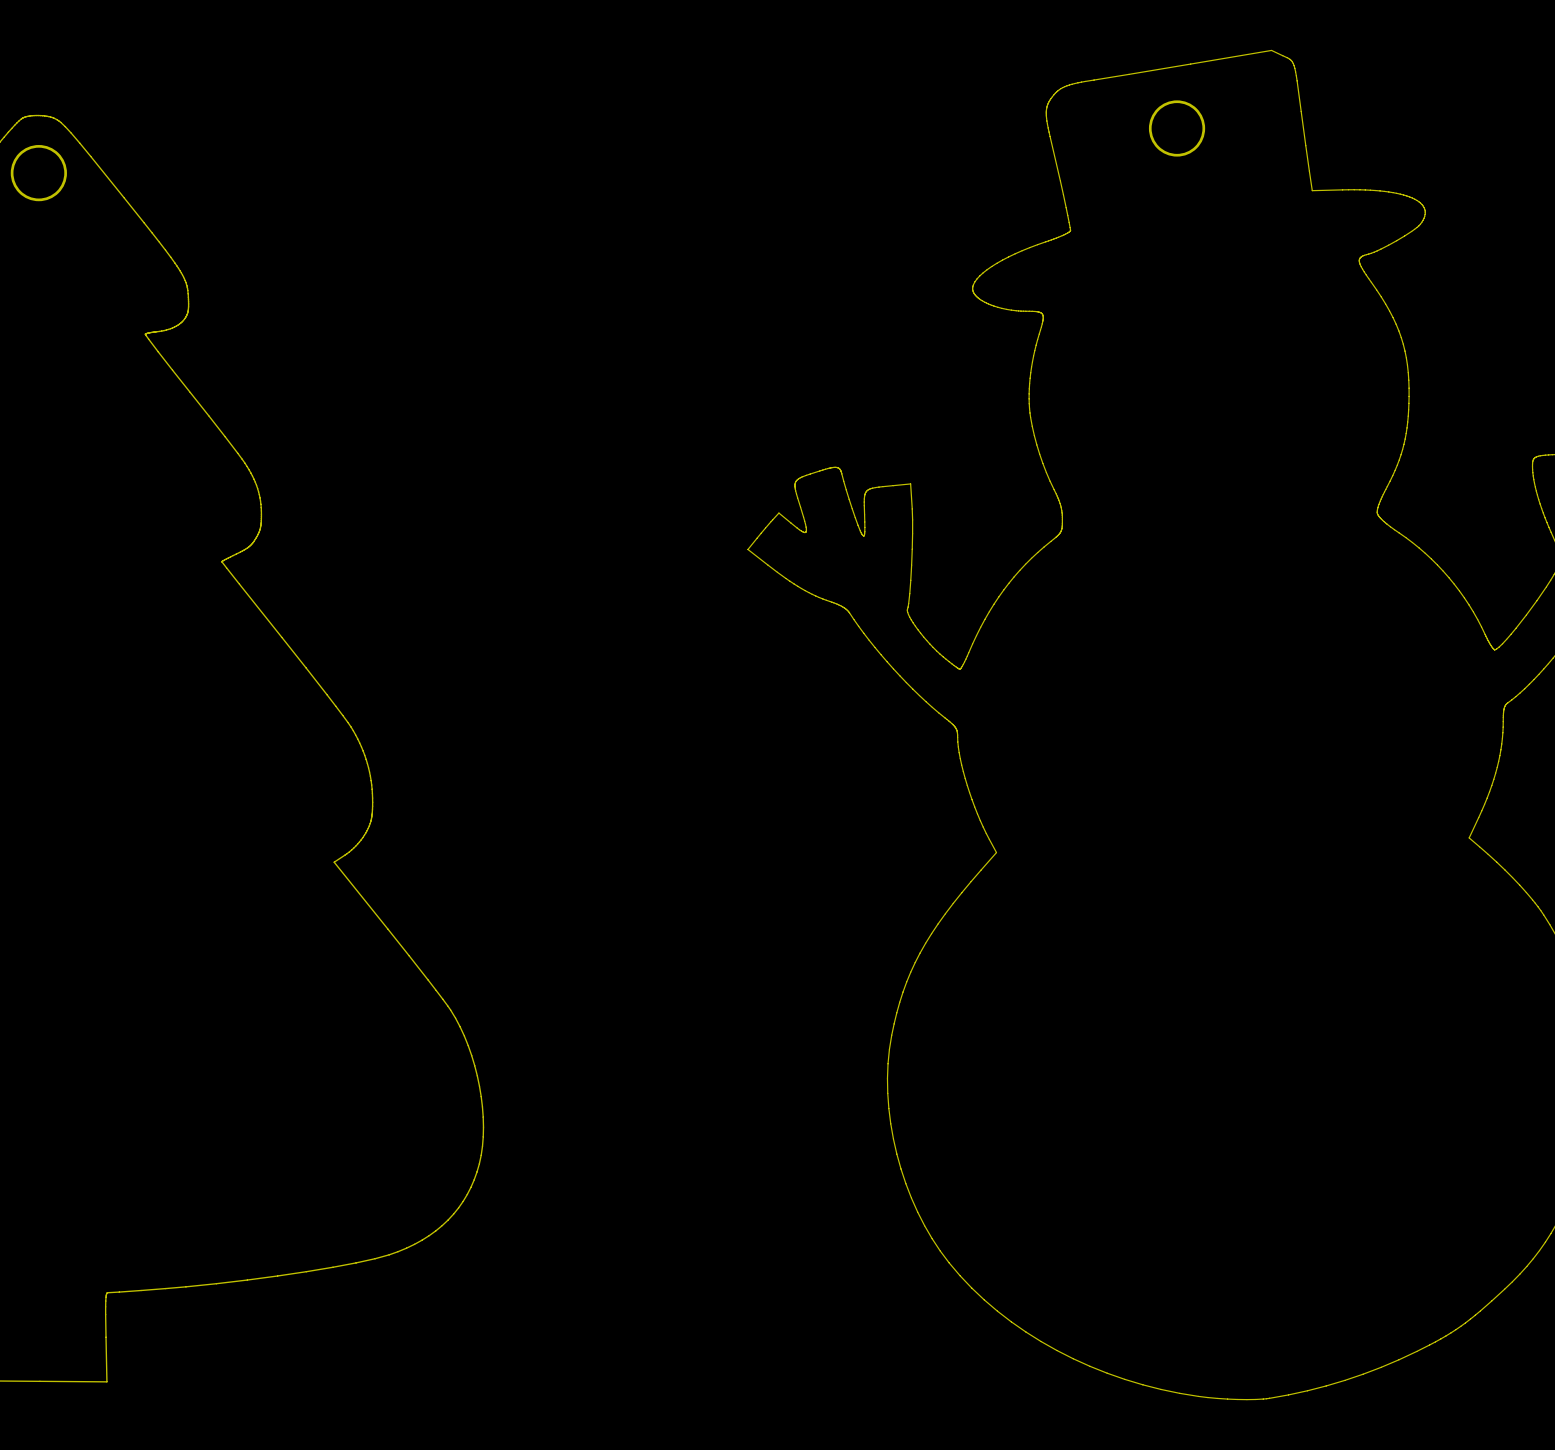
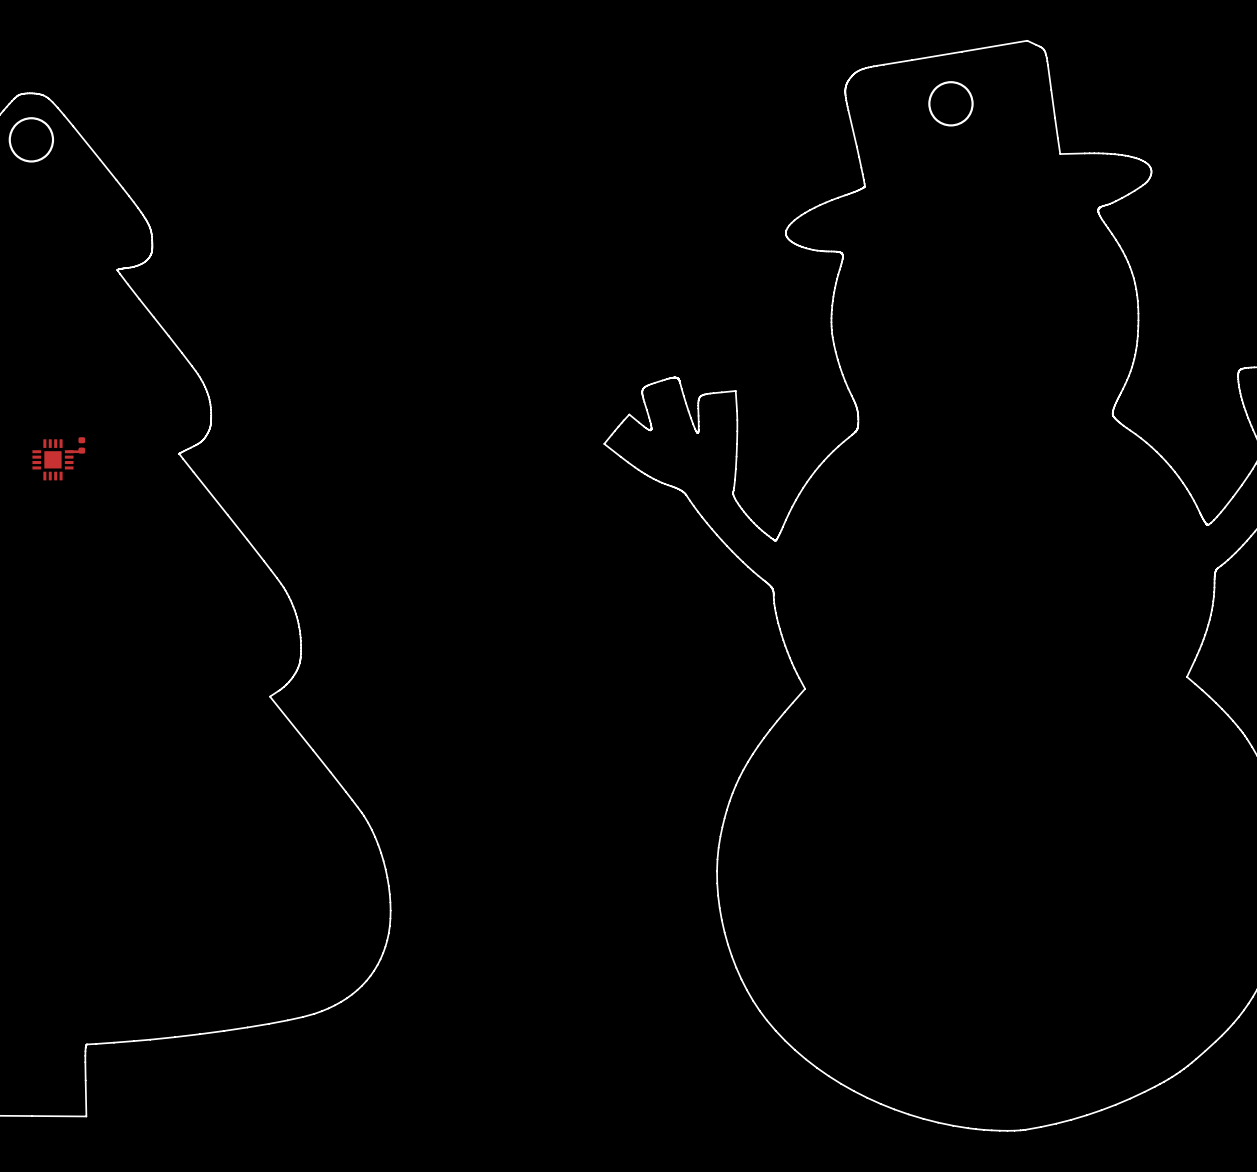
part: none -> (81, 445)
top track: none -> (81, 450) (69, 451)
part: none -> (52, 459)

